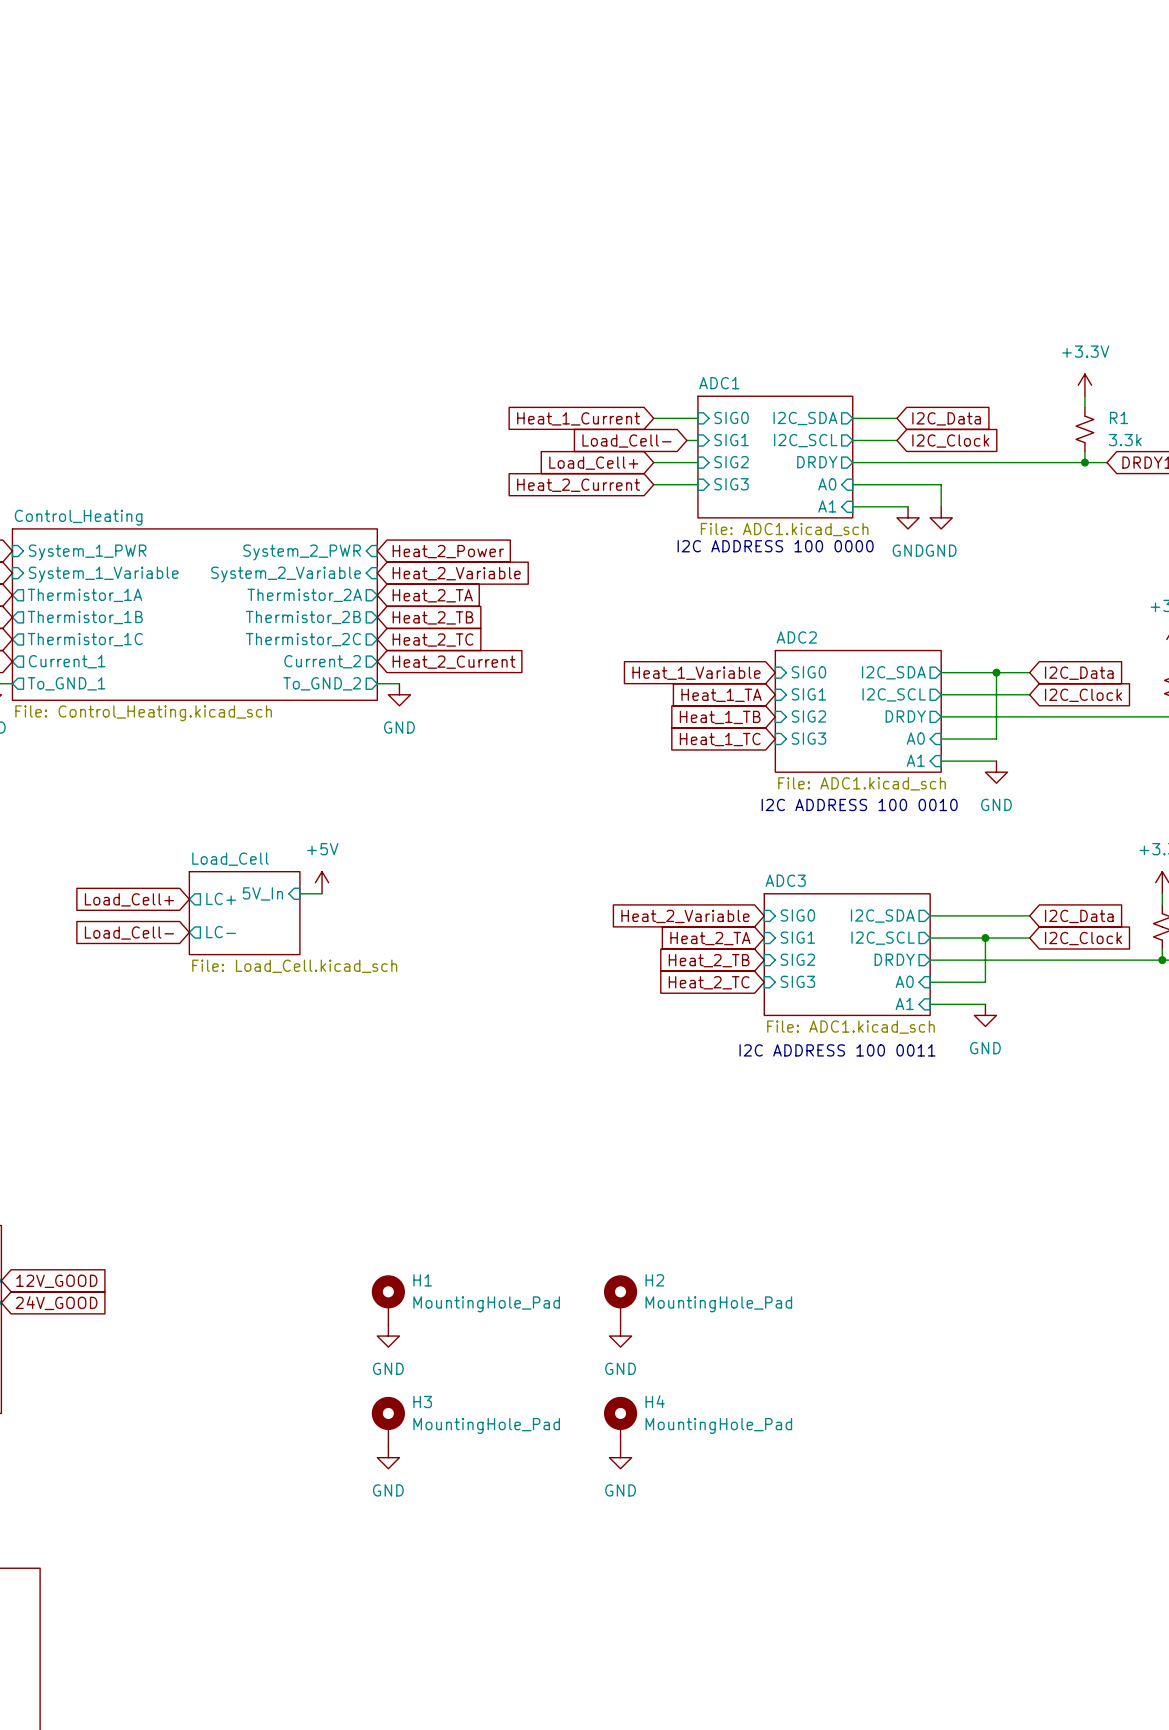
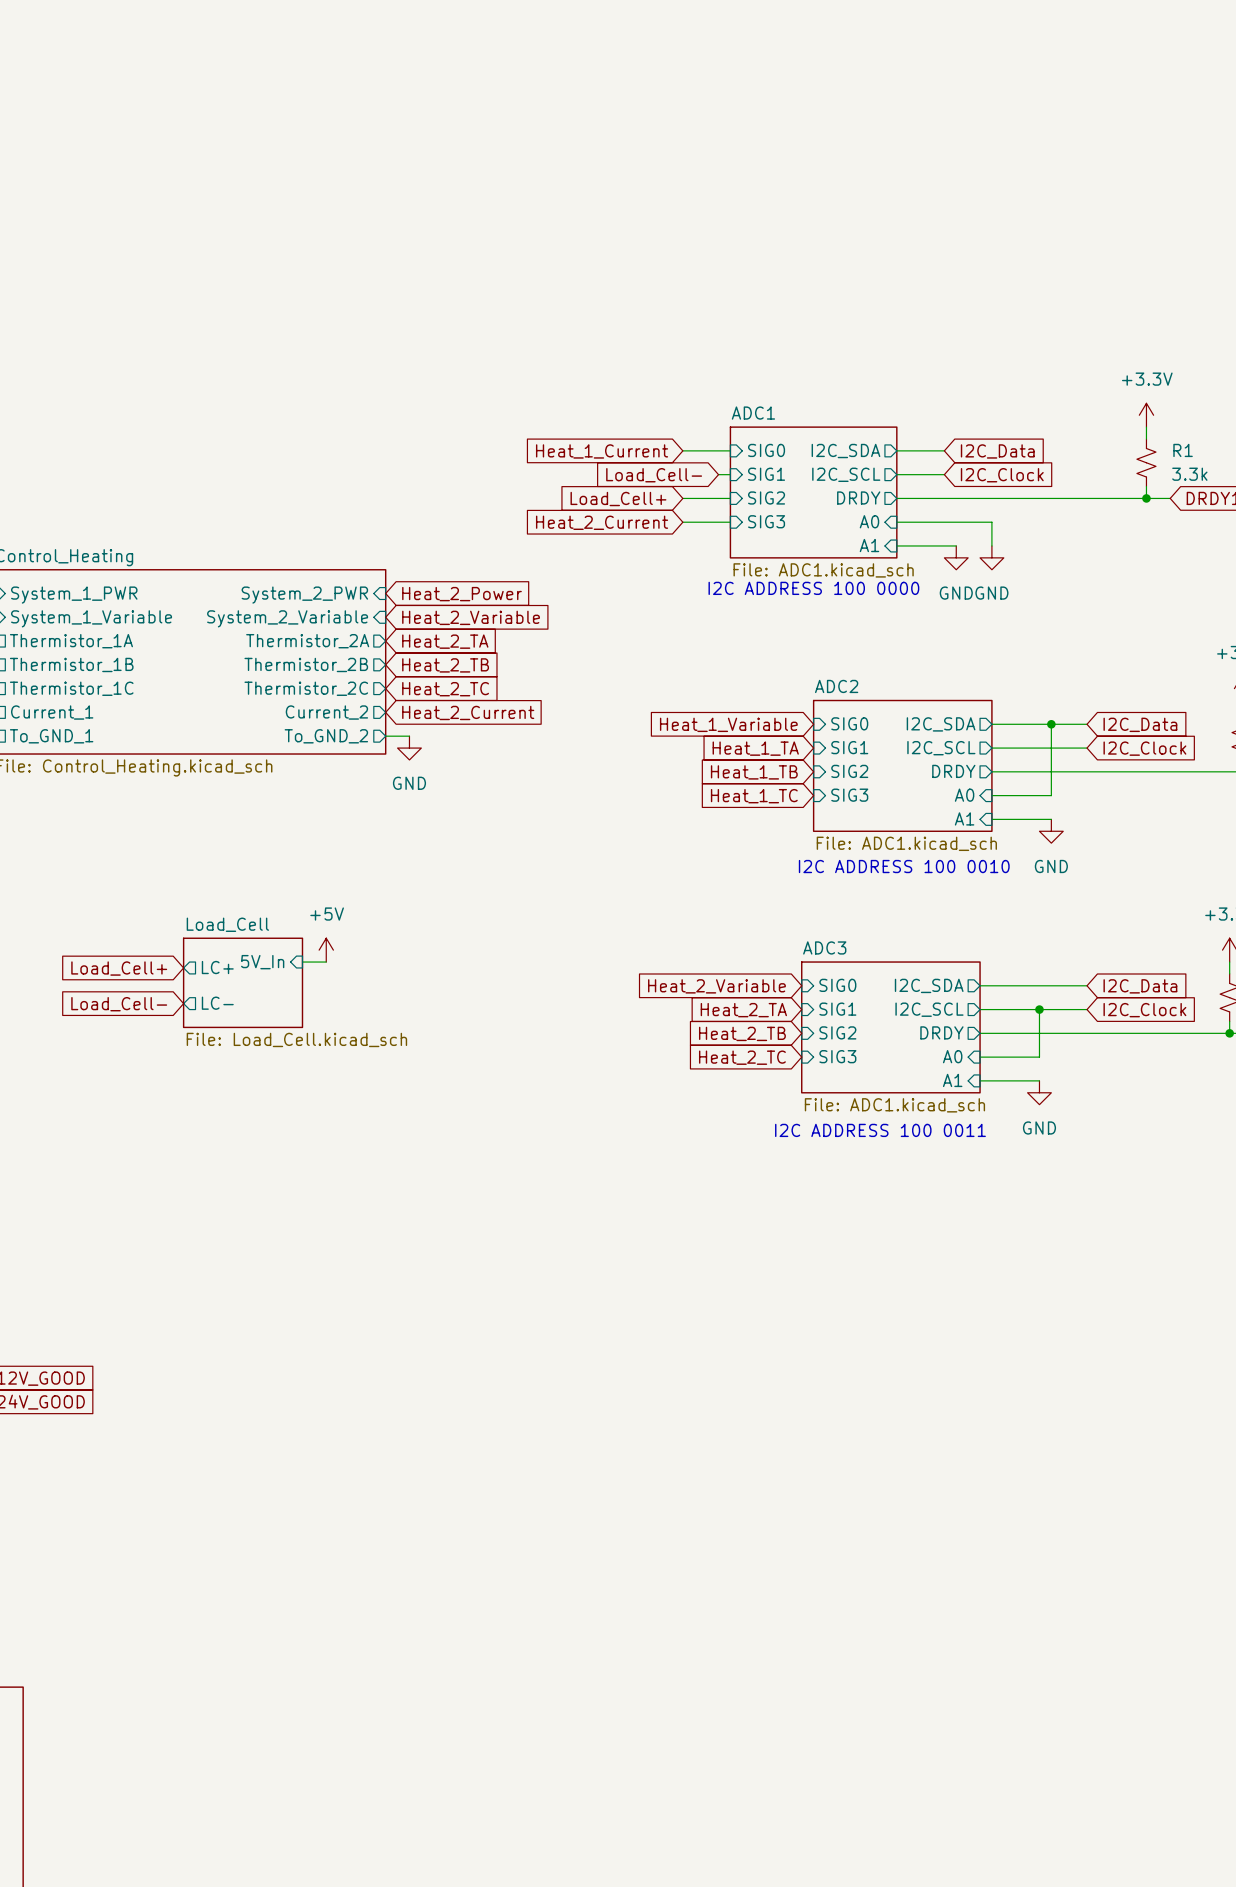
H1: MountingHole_Pad (388, 1300) -> none
H2: MountingHole_Pad (620, 1300) -> none
power symbol: GND (388, 1336) -> none
power symbol: GND (620, 1336) -> none
H3: MountingHole_Pad (388, 1421) -> none
H4: MountingHole_Pad (620, 1421) -> none
power symbol: GND (388, 1457) -> none
power symbol: GND (620, 1457) -> none

